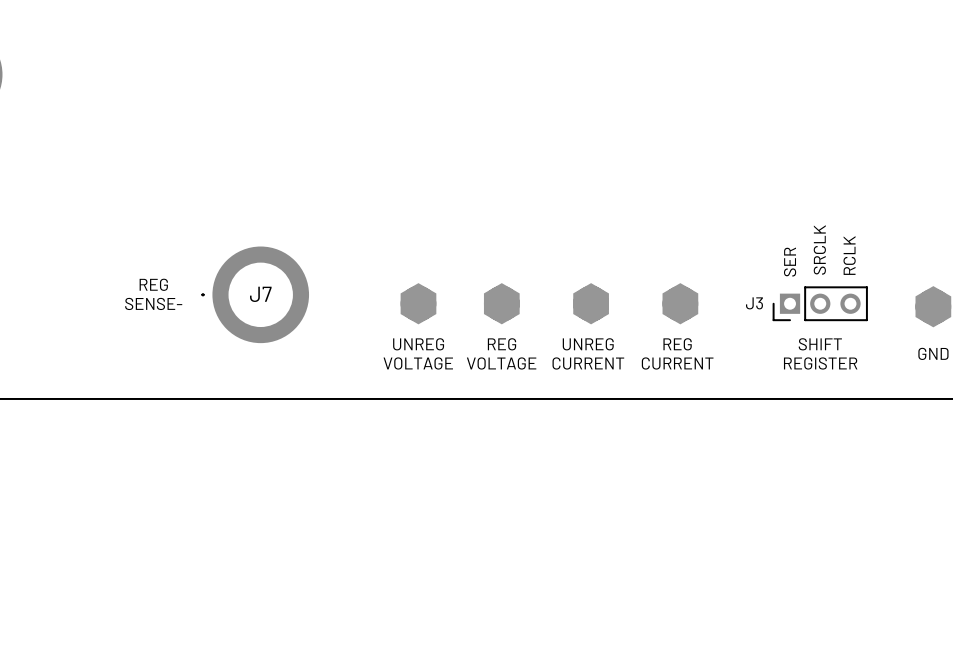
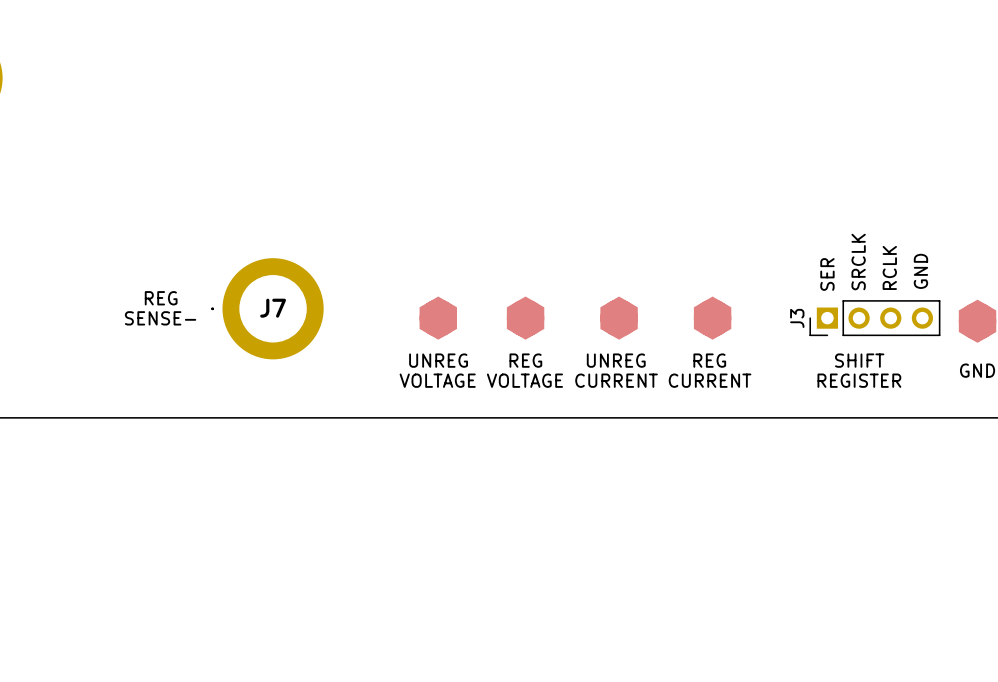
text: none -> GND (920, 271)
J3 footprint: [772, 286, 868, 321] -> [809, 300, 941, 337]

